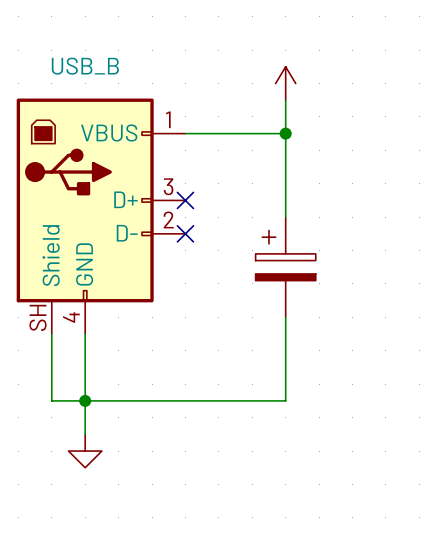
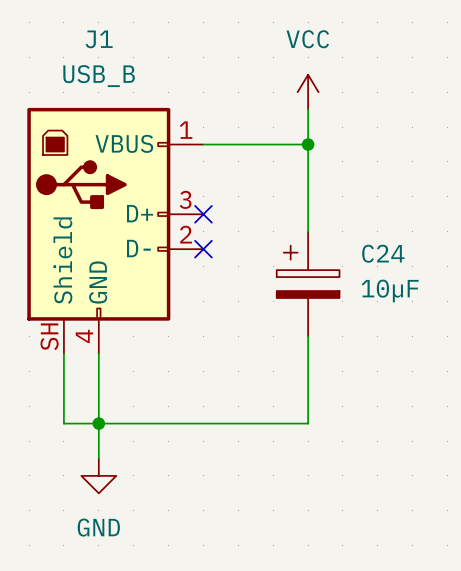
J1 name: none -> J1 (99, 39)
power symbol text: none -> VCC (307, 39)
C24 name: none -> C24 (383, 253)
C24 value: none -> 10µF (390, 290)
power symbol text: none -> GND (98, 527)

